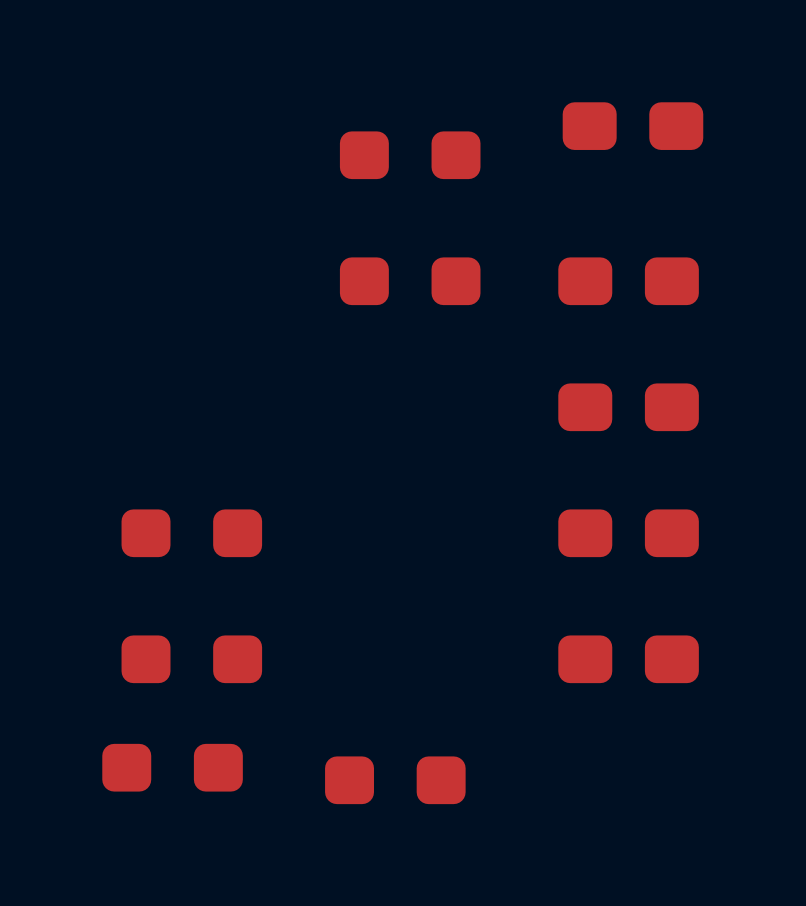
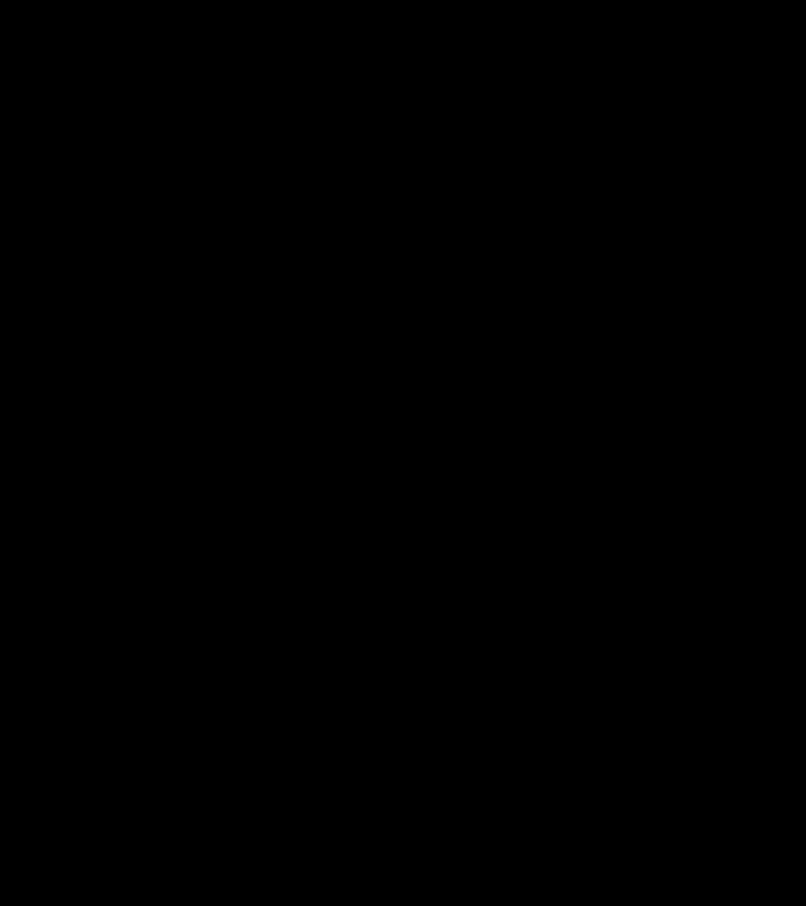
part: (632, 126) -> none
part: (410, 155) -> none
part: (410, 281) -> none
part: (628, 281) -> none
part: (628, 407) -> none
part: (191, 533) -> none
part: (628, 533) -> none
part: (191, 659) -> none
part: (628, 659) -> none
part: (172, 767) -> none
part: (395, 780) -> none

